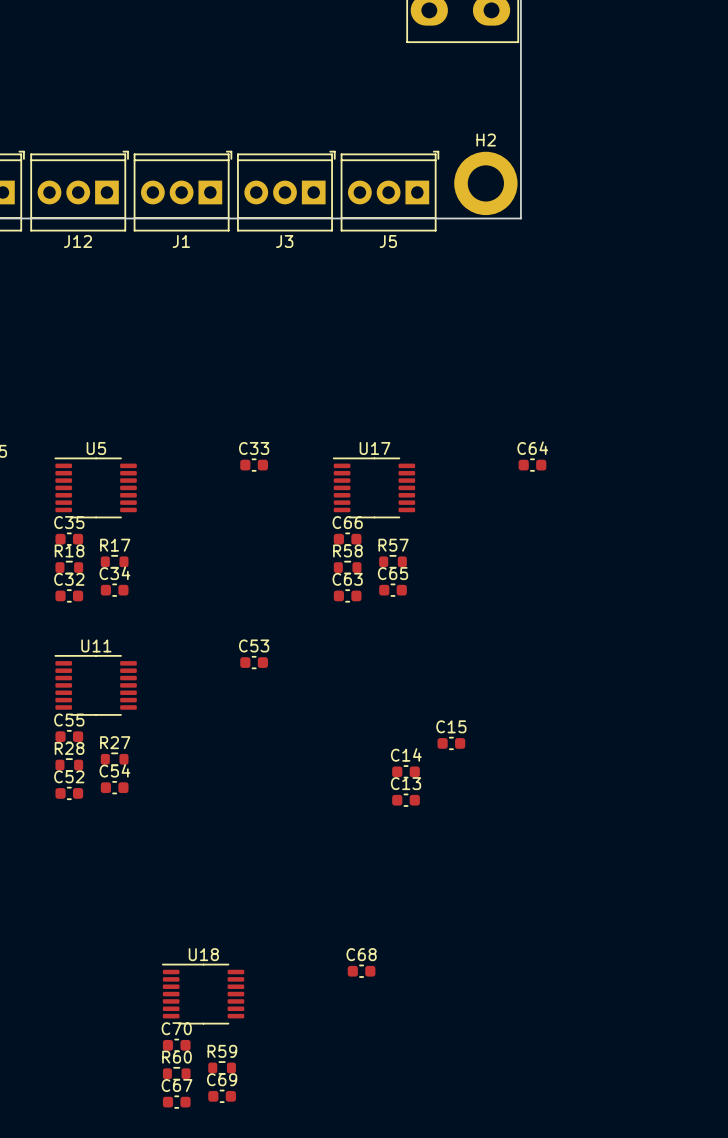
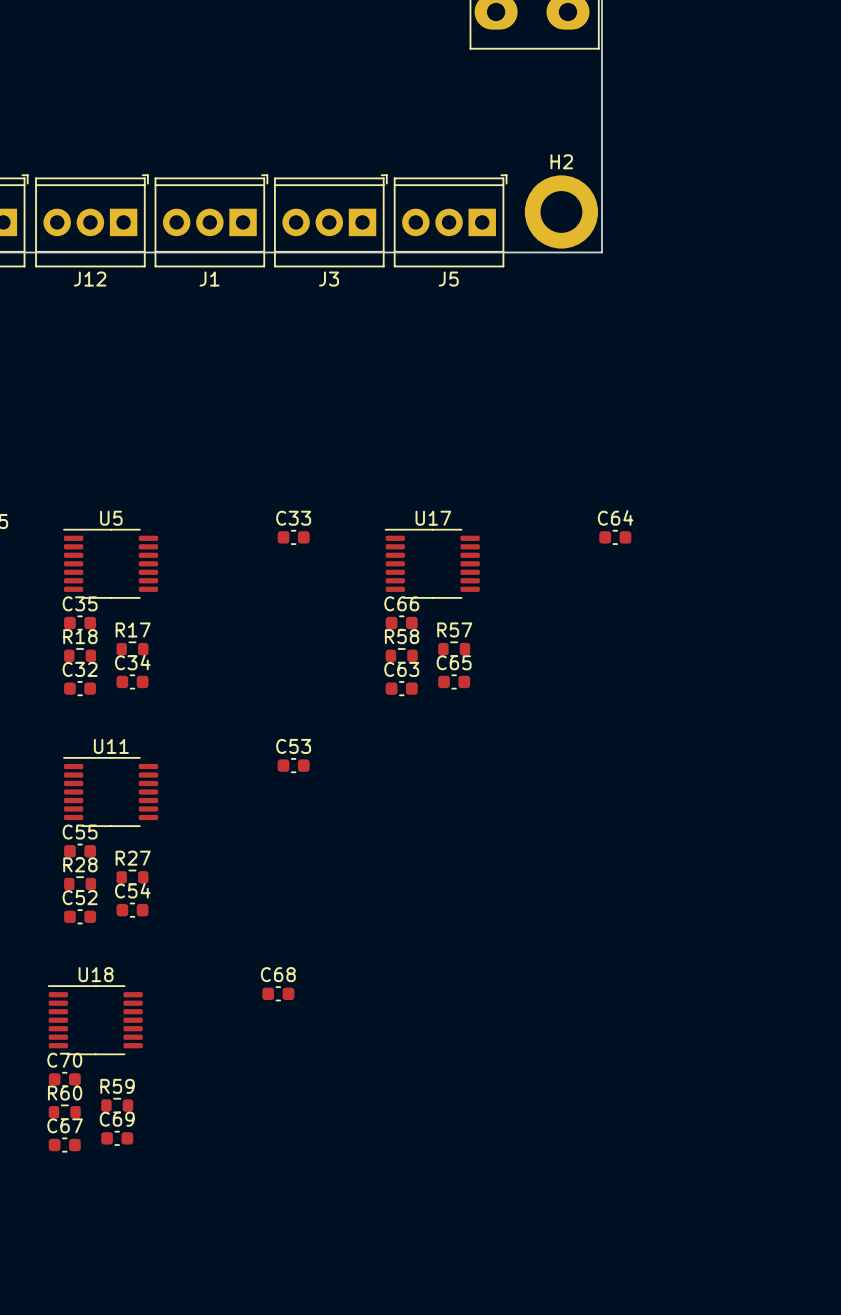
C15: (451, 743) -> none
C14: (406, 771) -> none
C13: (406, 800) -> none
C68 position: (361, 971) -> (278, 993)
U18 position: (203, 994) -> (95, 1020)
C70 position: (176, 1045) -> (64, 1079)
R59 position: (222, 1067) -> (117, 1105)
R60 position: (176, 1073) -> (64, 1112)
C69 position: (222, 1096) -> (117, 1138)
C67 position: (176, 1102) -> (64, 1145)

